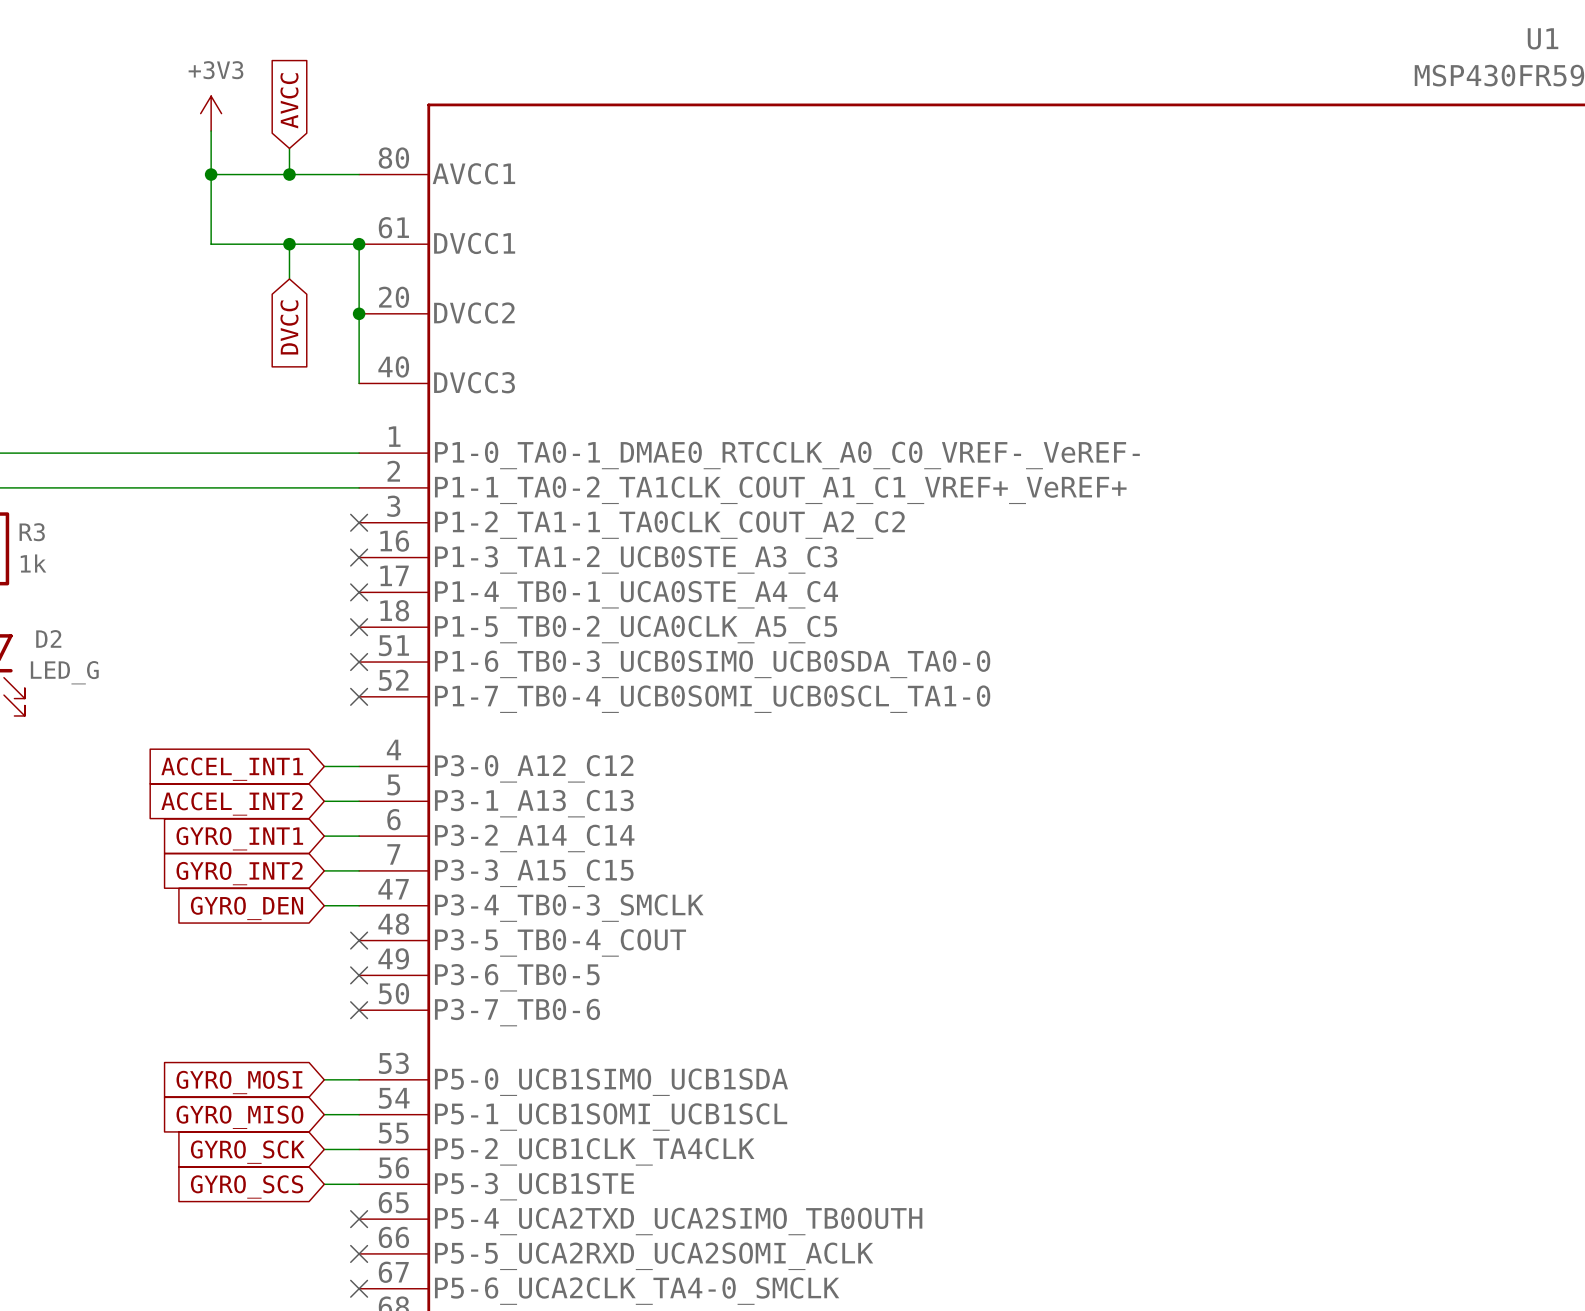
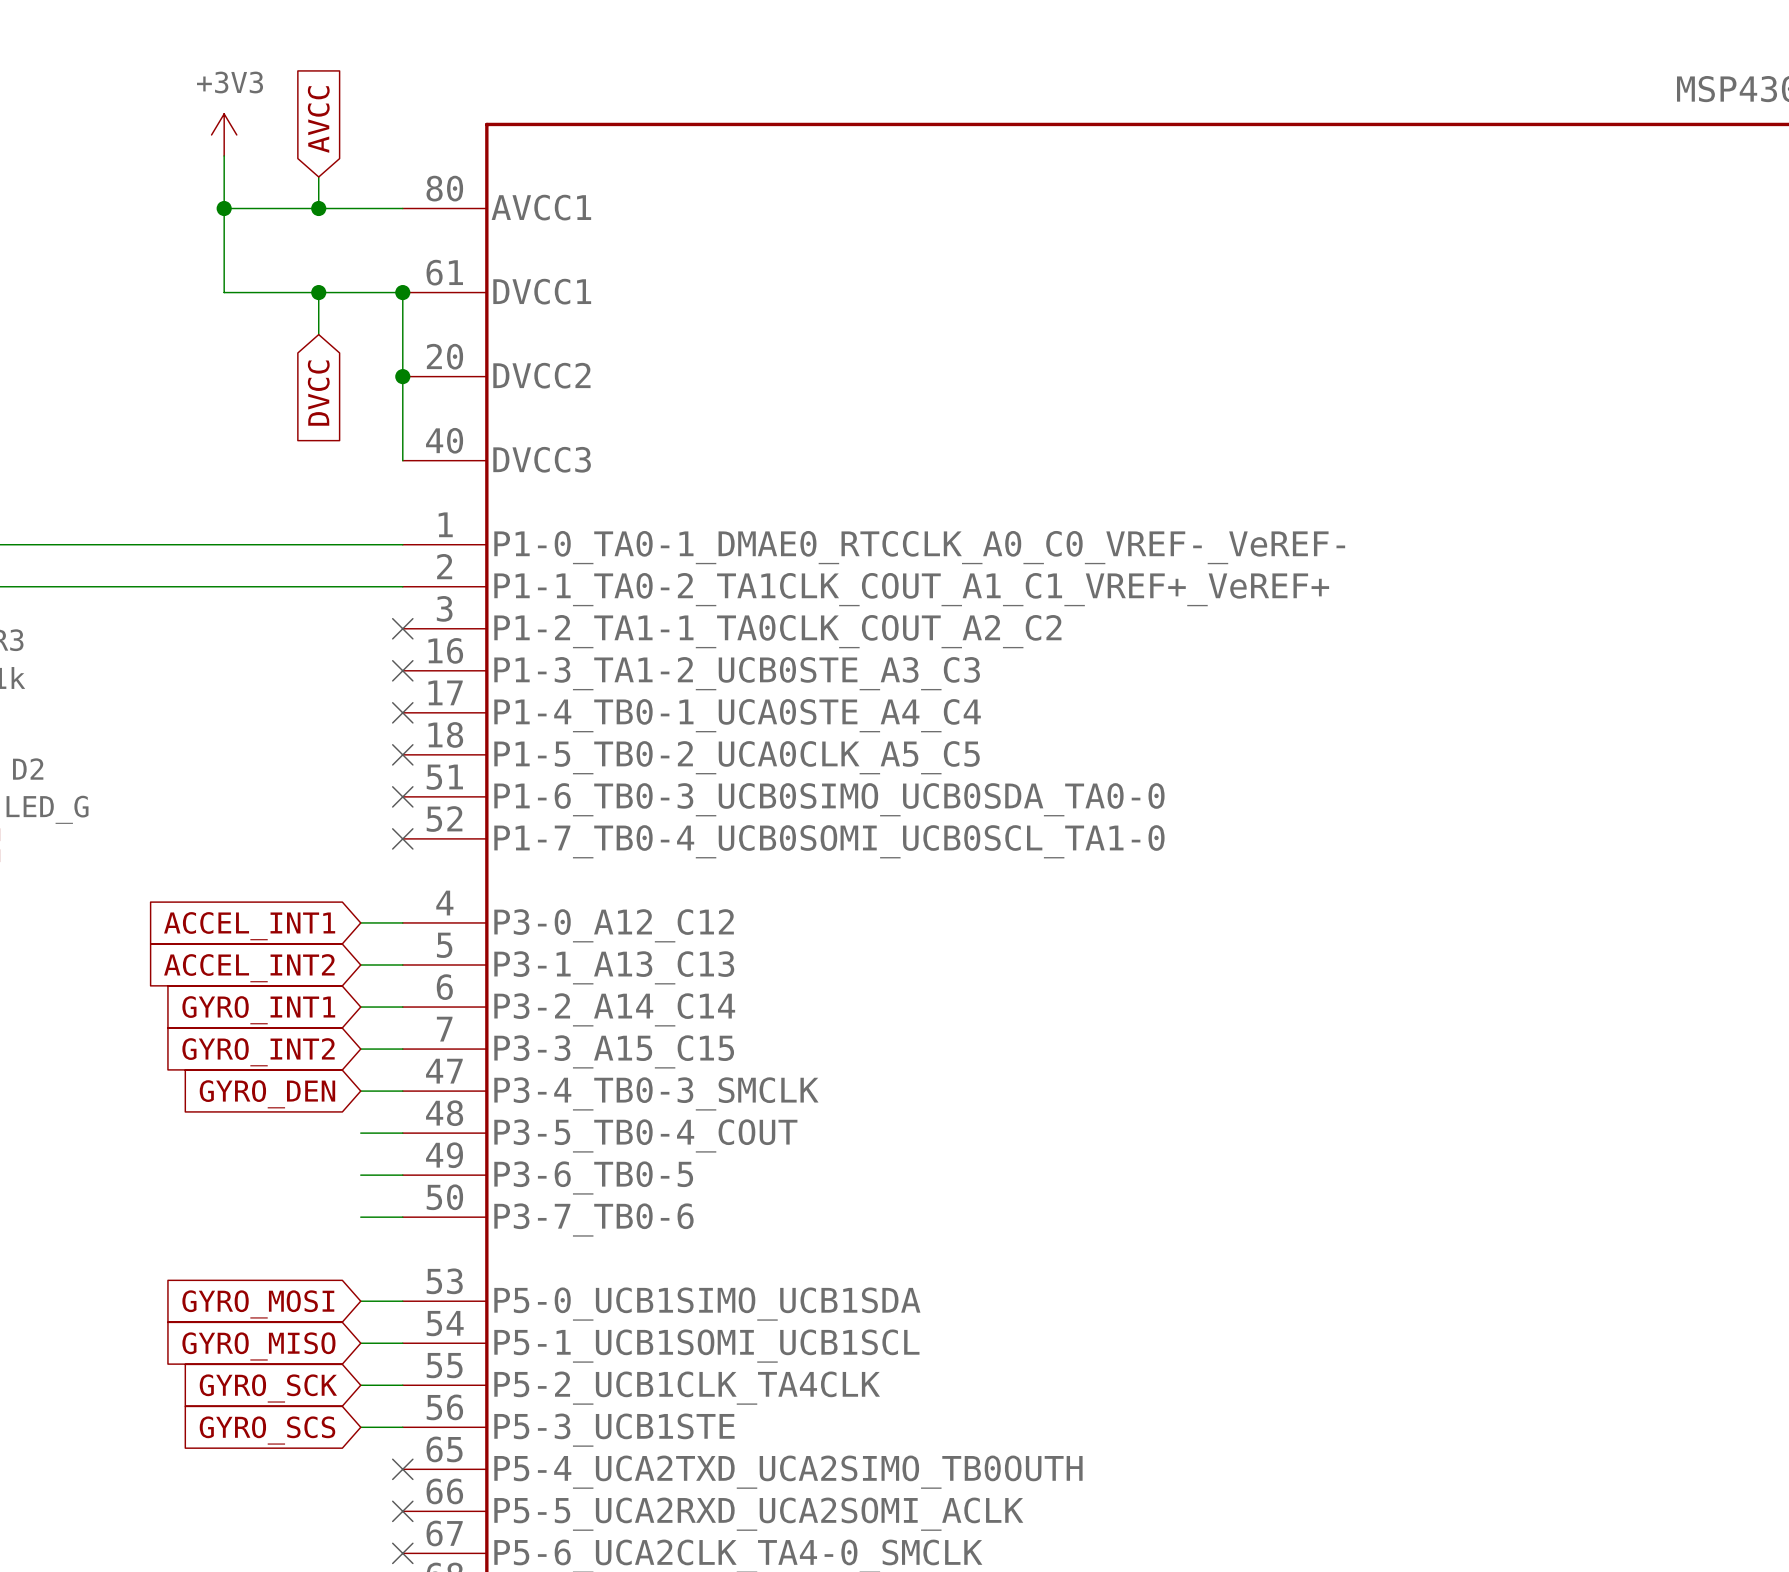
wire: none -> (360, 1133) (402, 1133)
no-connect mark: (359, 940) -> none
wire: none -> (360, 1175) (402, 1175)
no-connect mark: (359, 975) -> none
wire: none -> (360, 1217) (402, 1217)
no-connect mark: (359, 1010) -> none

